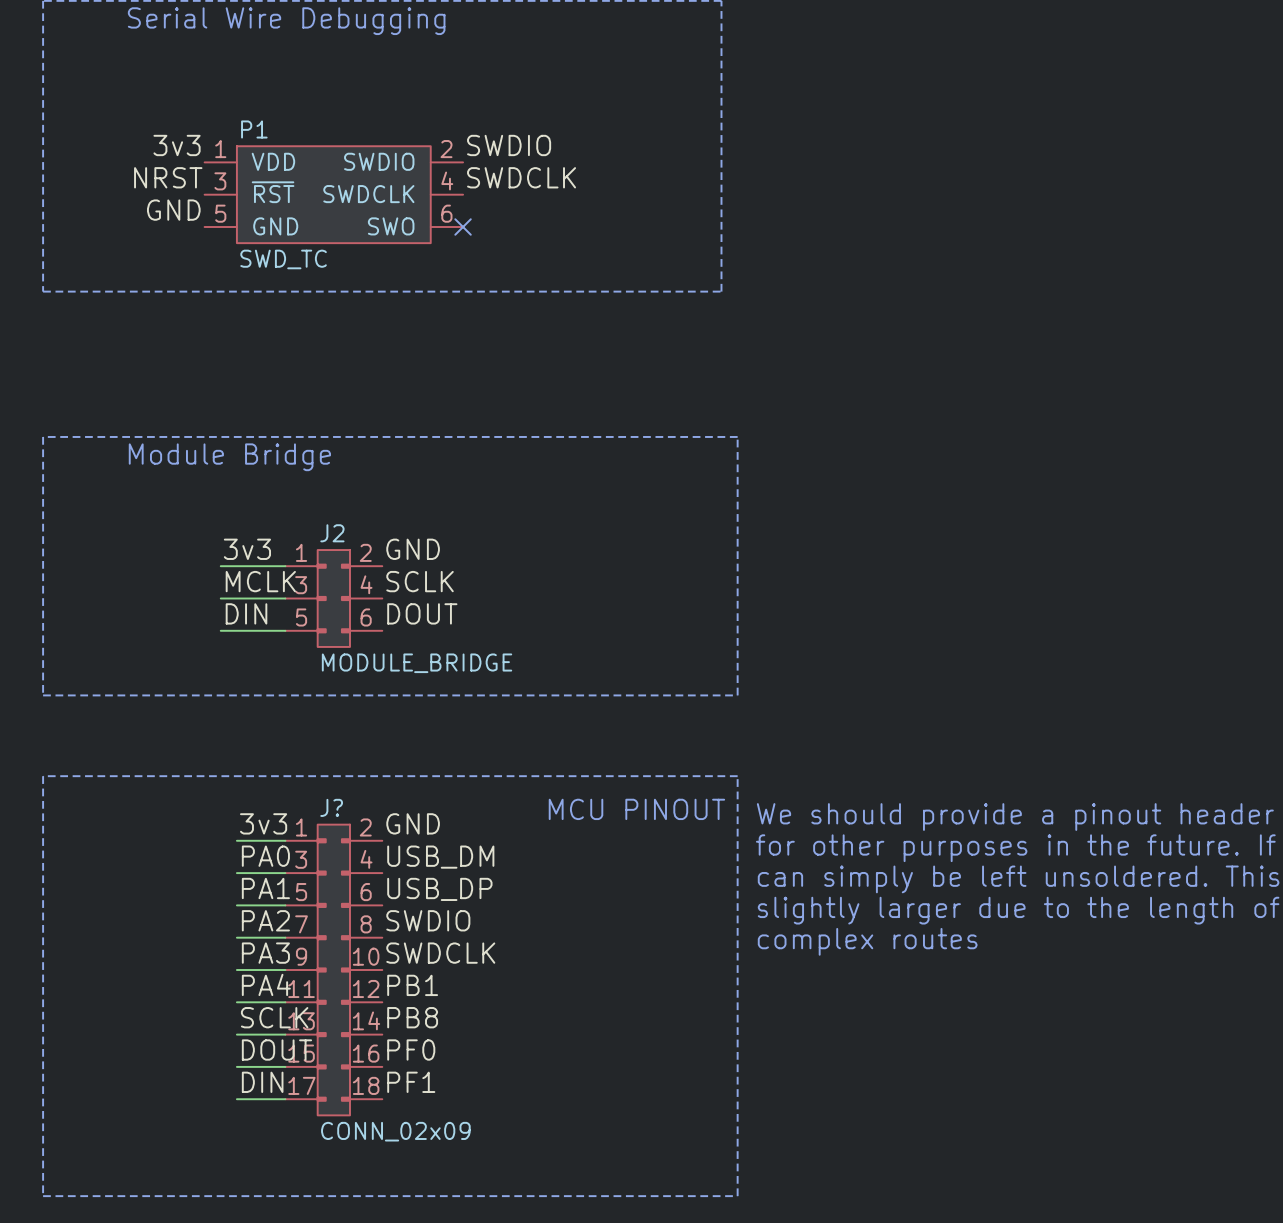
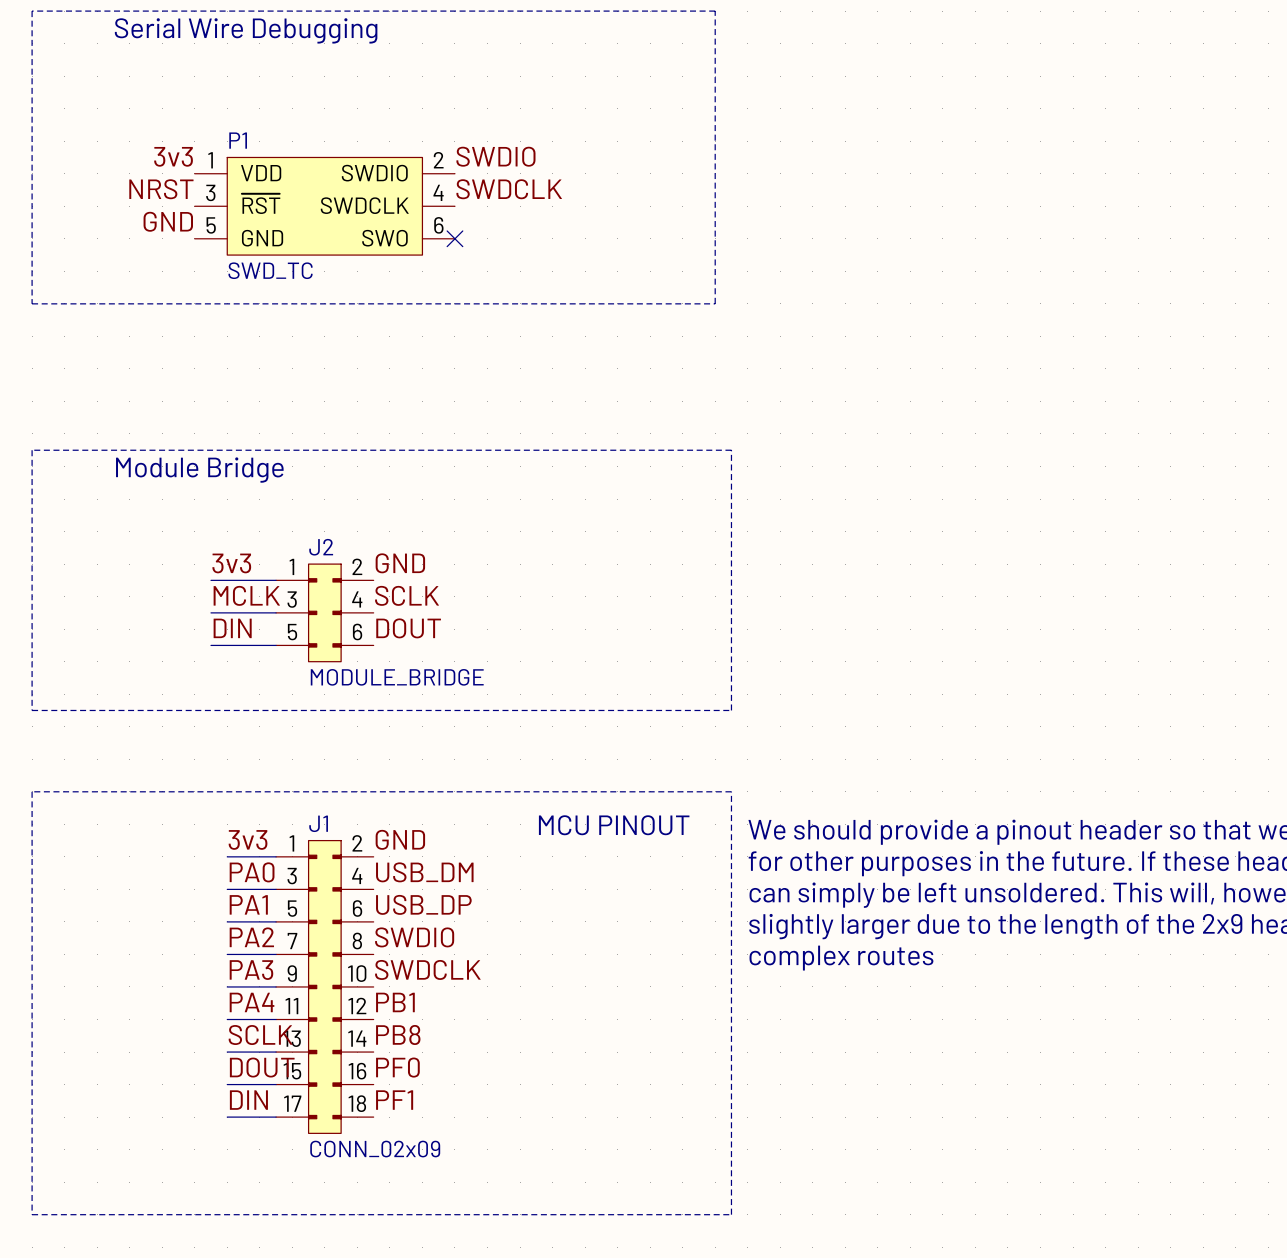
J? name: J? (331, 807) -> J1 (318, 823)

